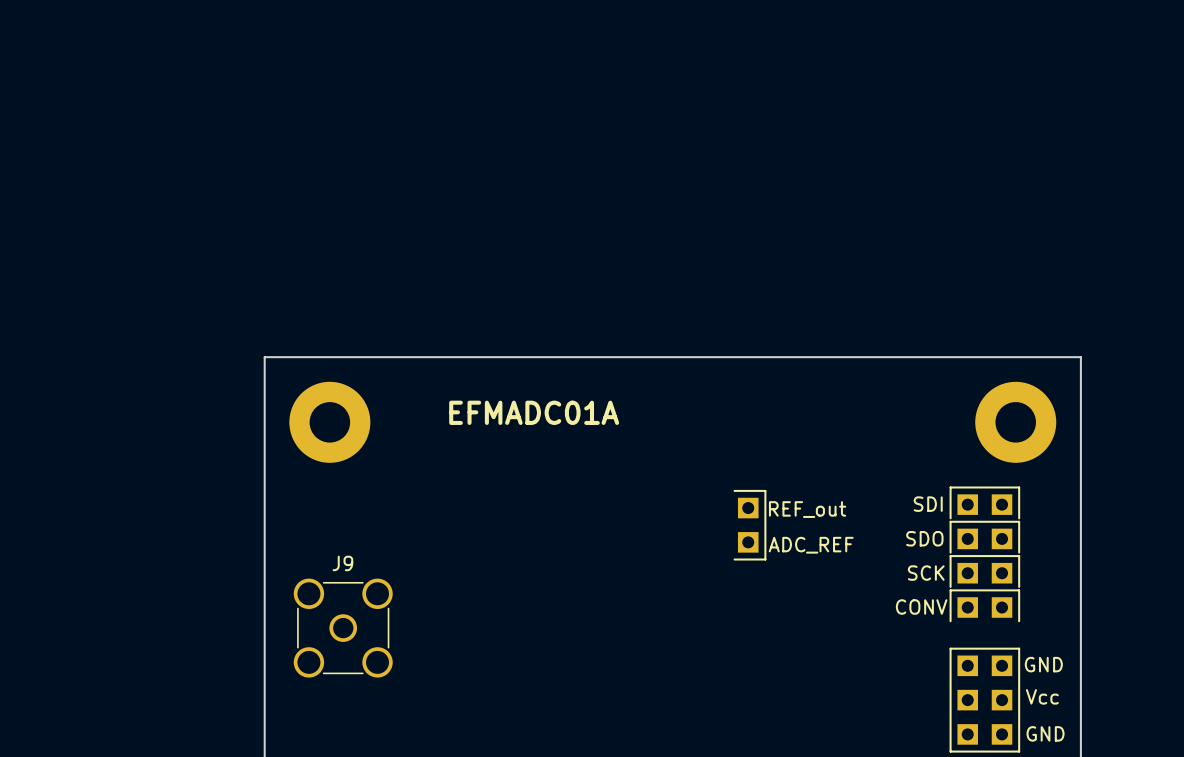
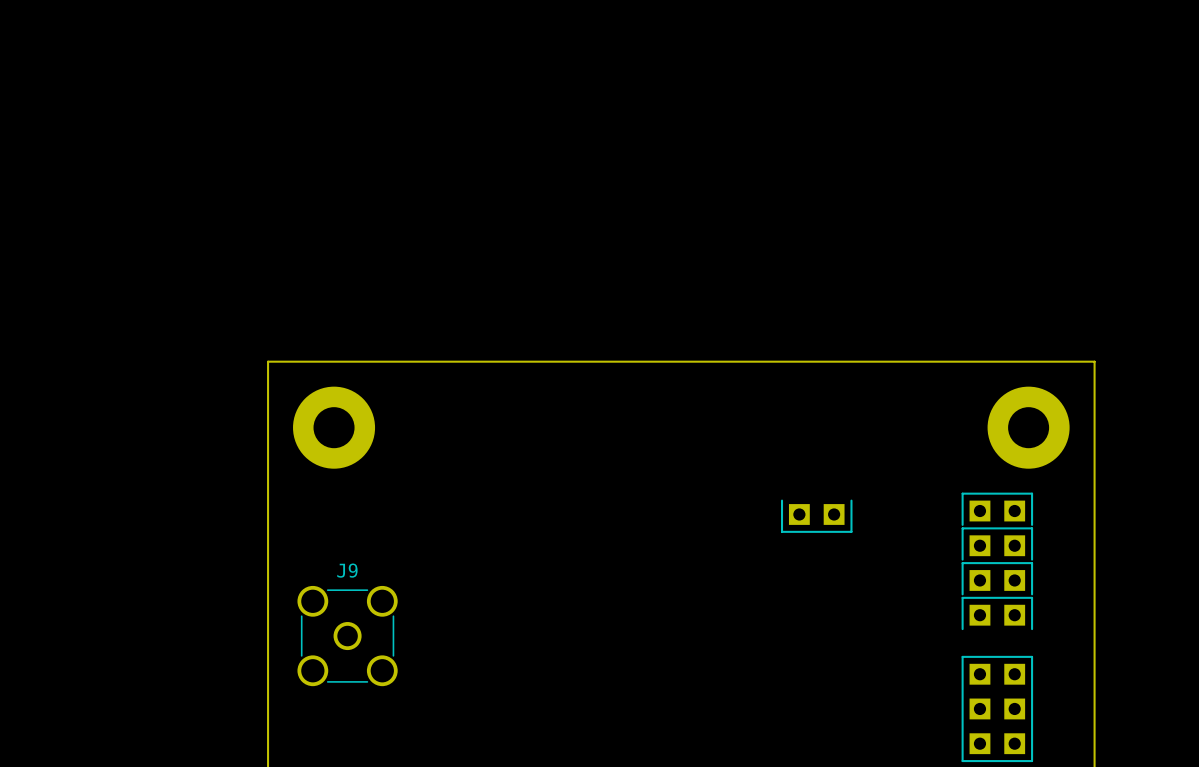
text: EFMADC01A (534, 412) -> none
text: SDI (928, 504) -> none
text: REF_out (807, 509) -> none
part rotation: 0° (749, 525) -> 90° clockwise (816, 516)
part position: (749, 525) -> (816, 516)
text: SDO (924, 538) -> none
text: ADC_REF (811, 545) -> none
text: SCK (926, 573) -> none
text: CONV (921, 607) -> none
text: GND (1043, 664) -> none
text: Vcc (1042, 696) -> none
text: GND (1045, 733) -> none

